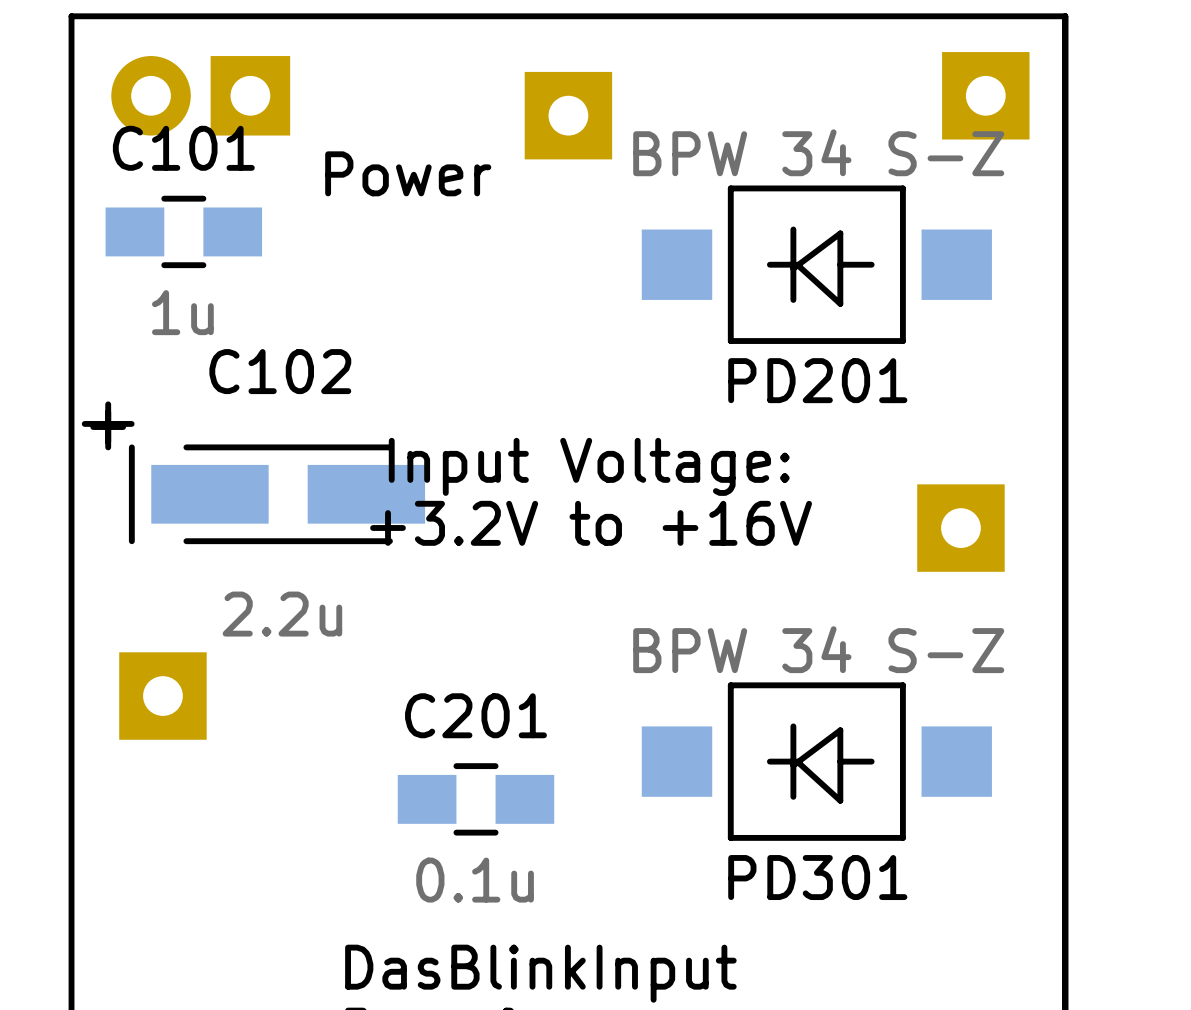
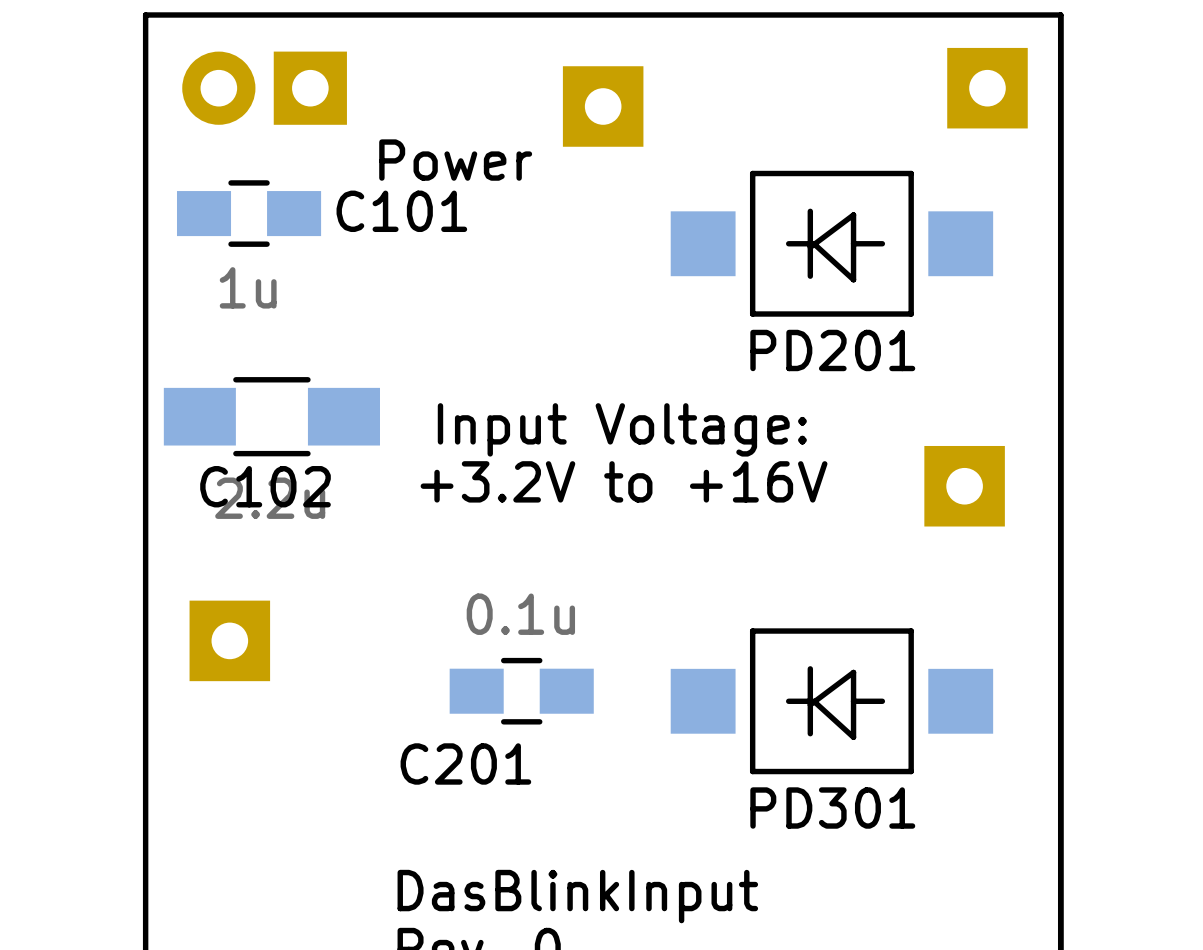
C101 name position: C101 (183, 148) -> C101 (401, 211)
PD201 value: BPW 34 S-Z (818, 152) -> none
C102 name position: C102 (280, 371) -> C102 (265, 486)
C102 footprint: [81, 401, 426, 545] -> [163, 377, 380, 457]
PD301 value: BPW 34 S-Z (818, 649) -> none
C201 name position: C201 (475, 715) -> C201 (465, 763)
C201 position: (475, 799) -> (521, 691)
C201 value position: 0.1u (475, 880) -> 0.1u (520, 614)

